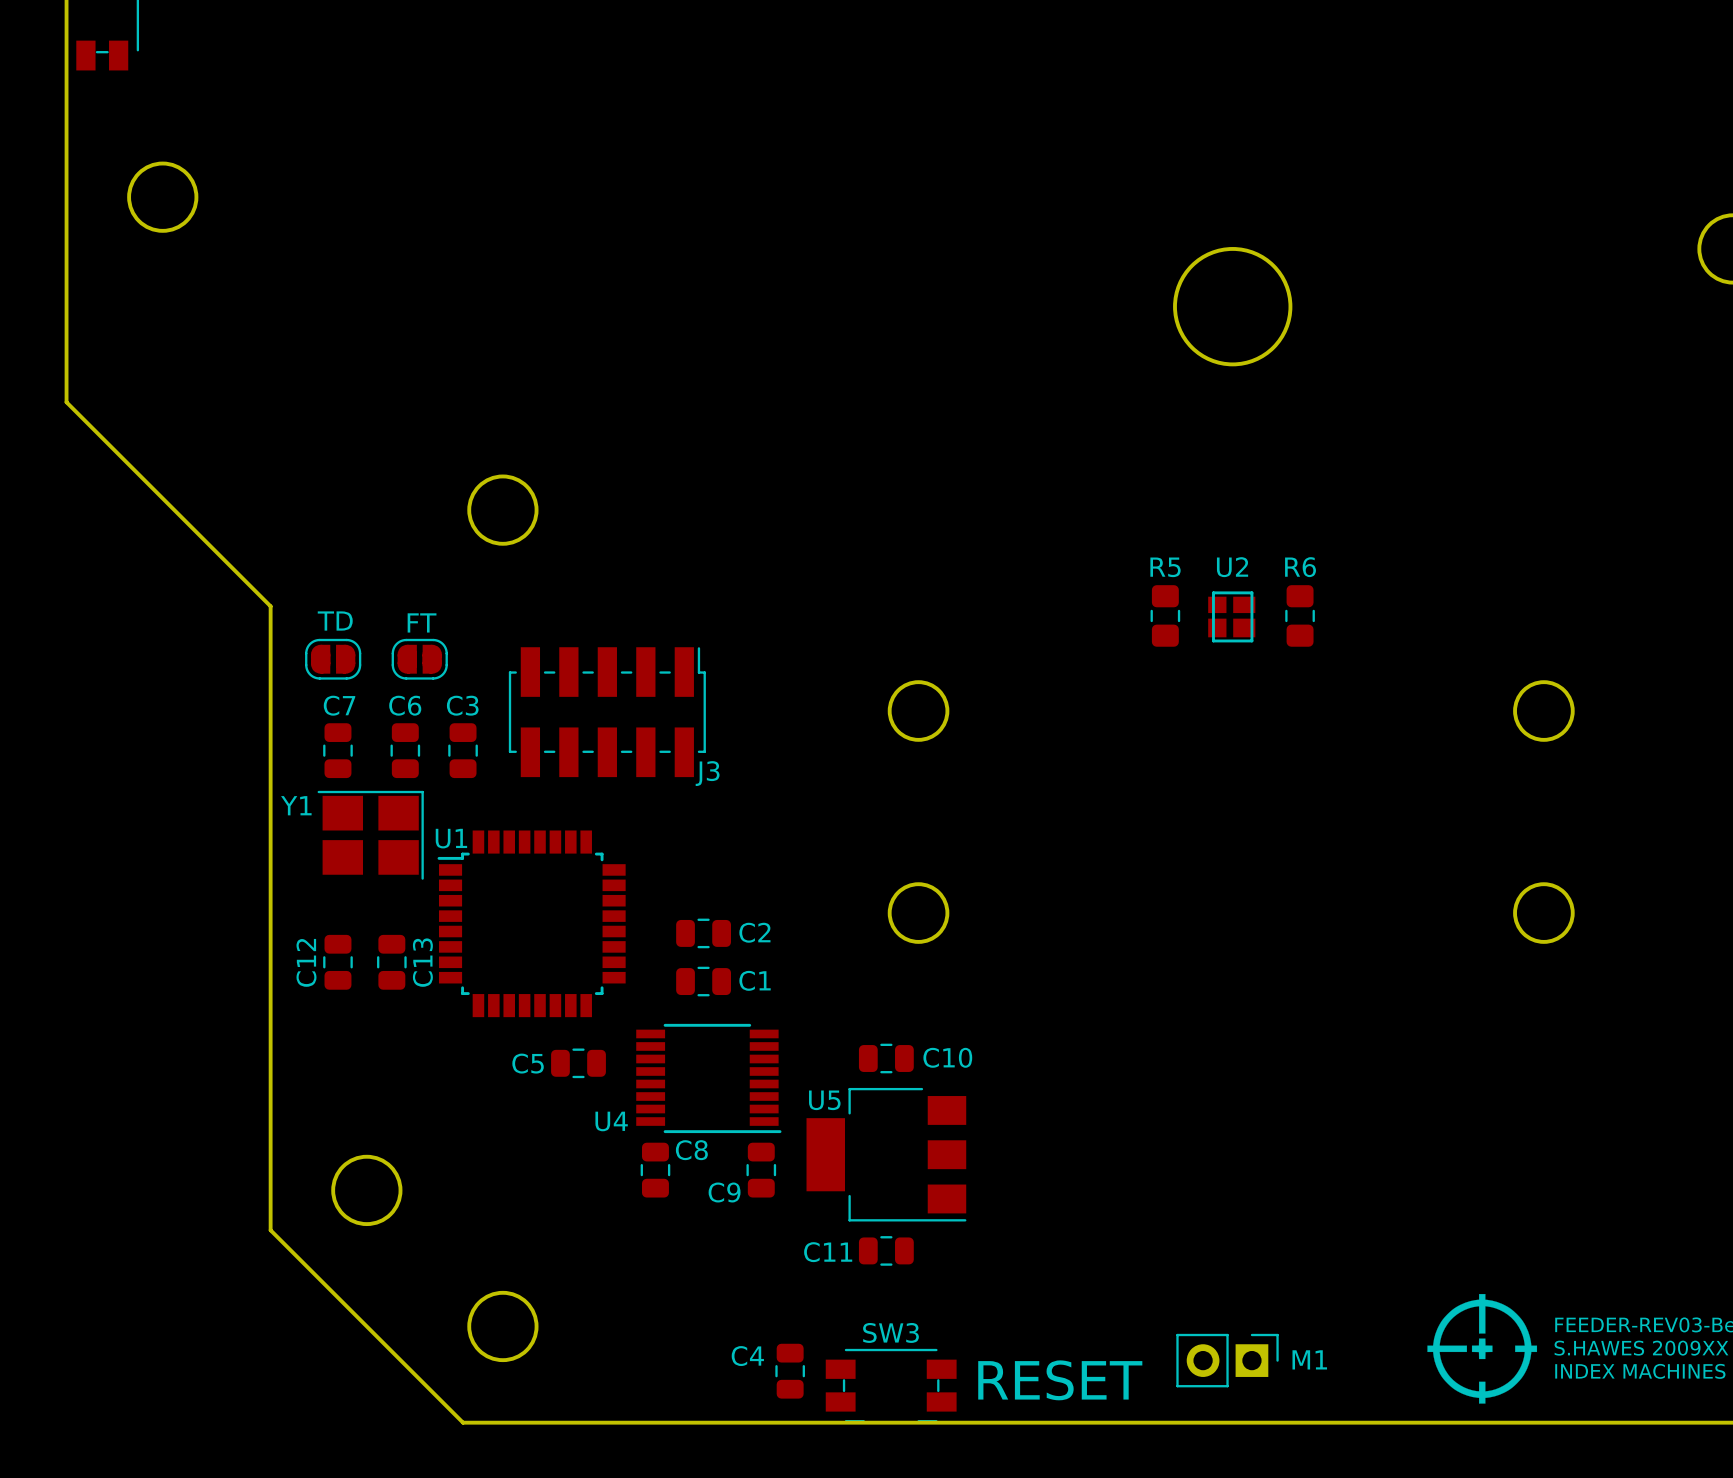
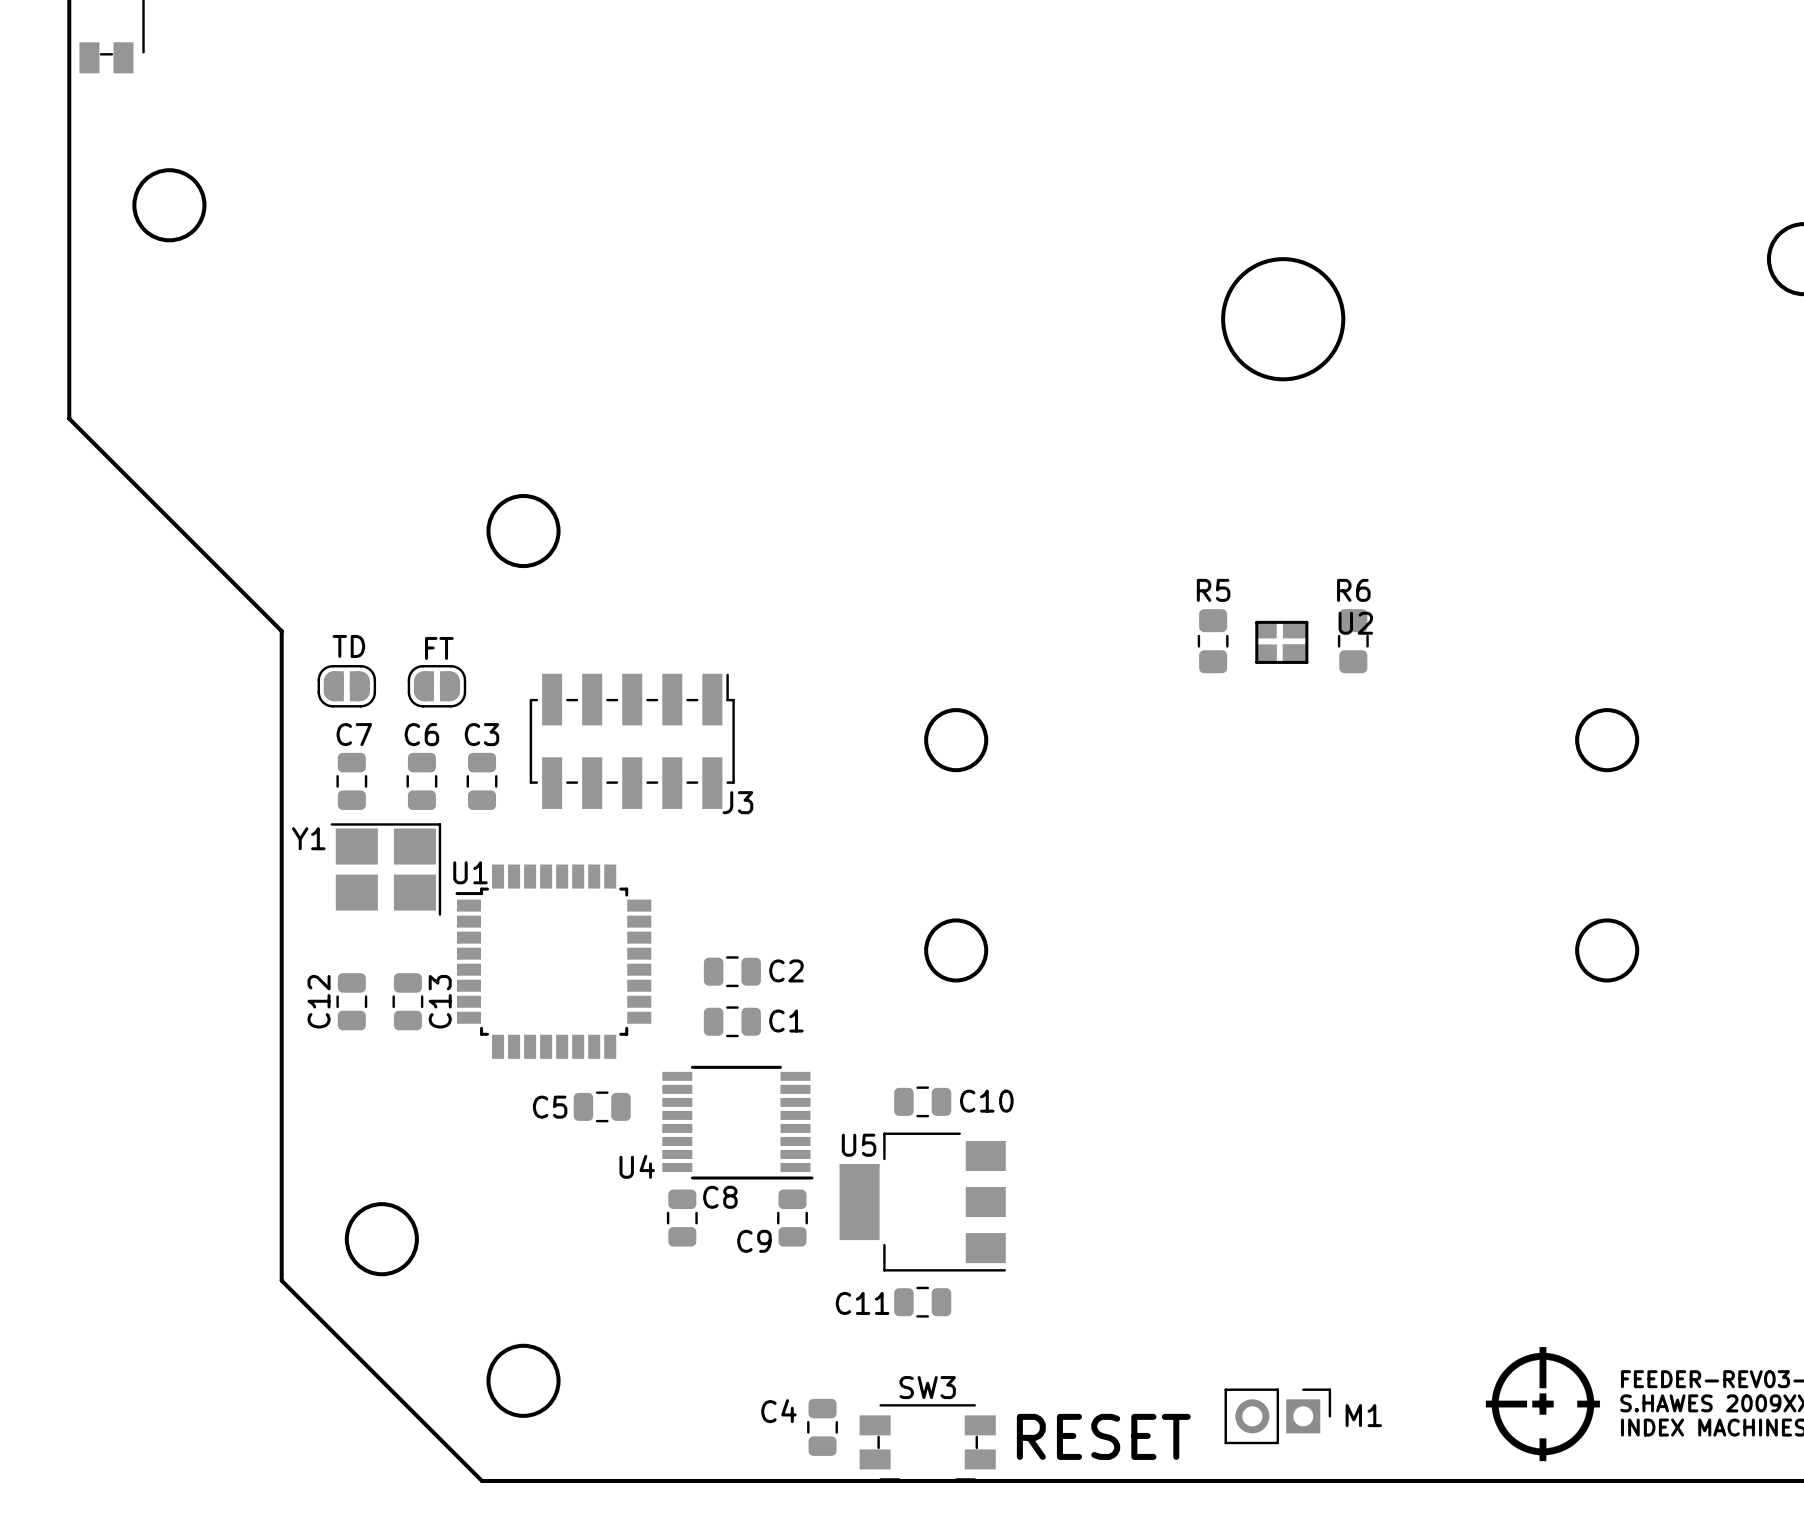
U2 name position: U2 (1232, 567) -> U2 (1355, 623)
U2 footprint: [1208, 591, 1256, 643] -> [1255, 620, 1309, 664]

